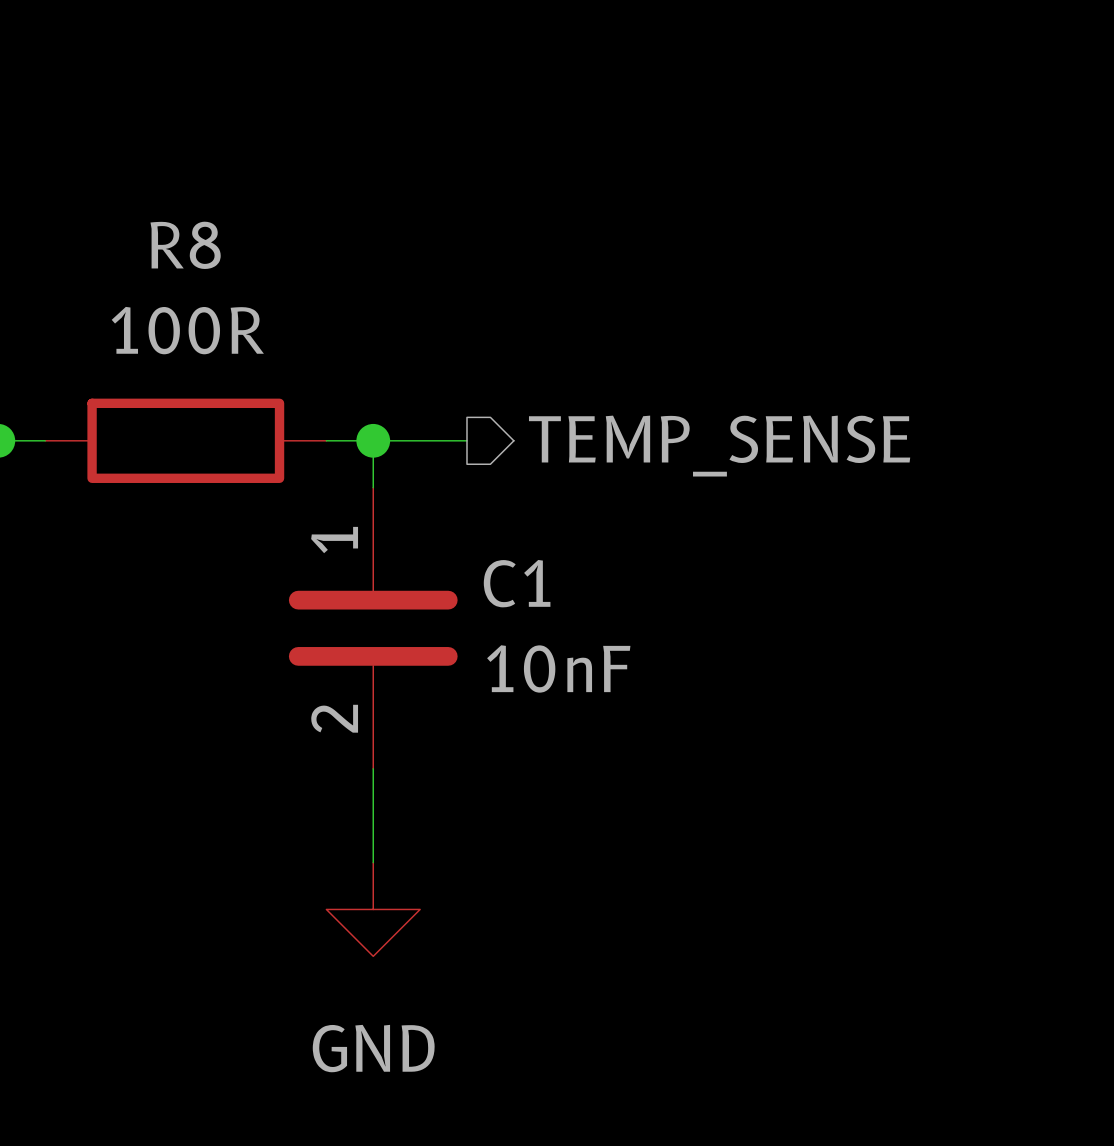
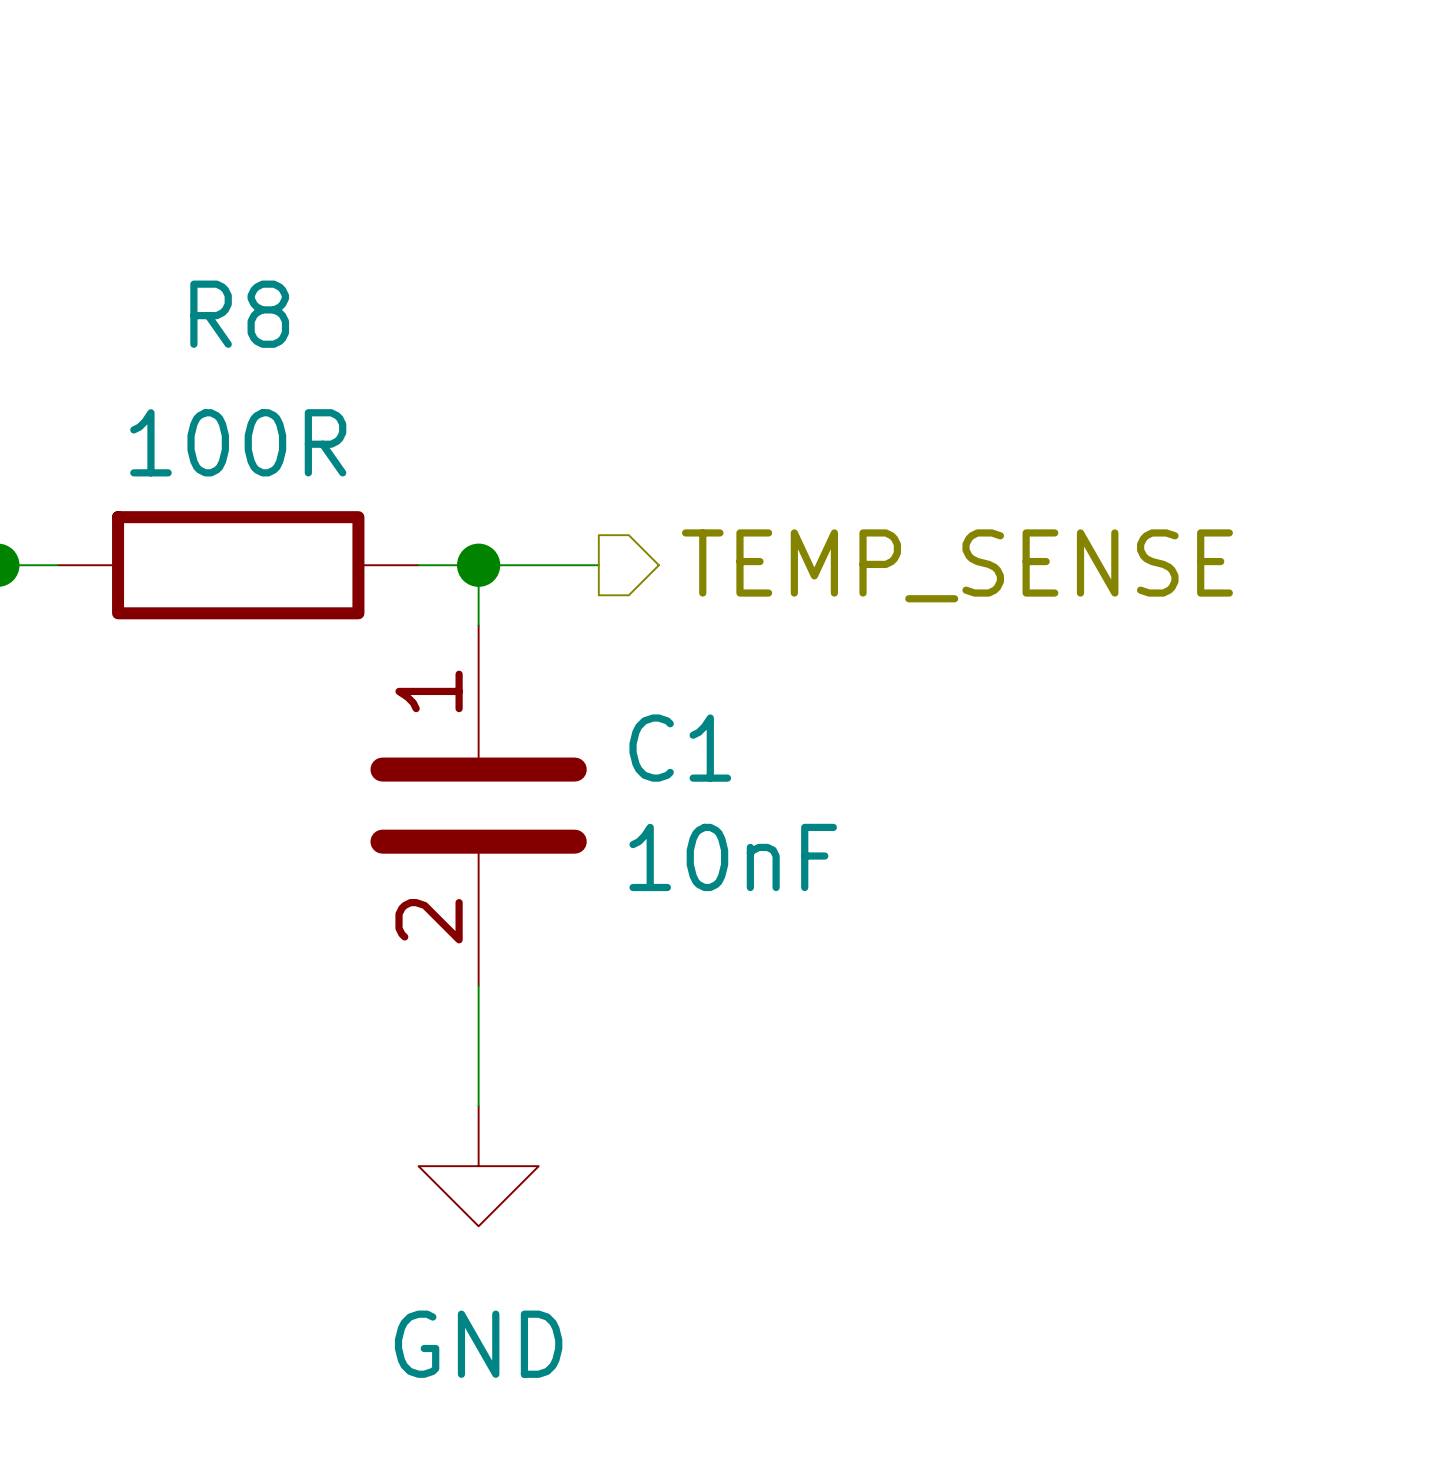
R8 value position: 100R (187, 330) -> 100R (238, 442)

